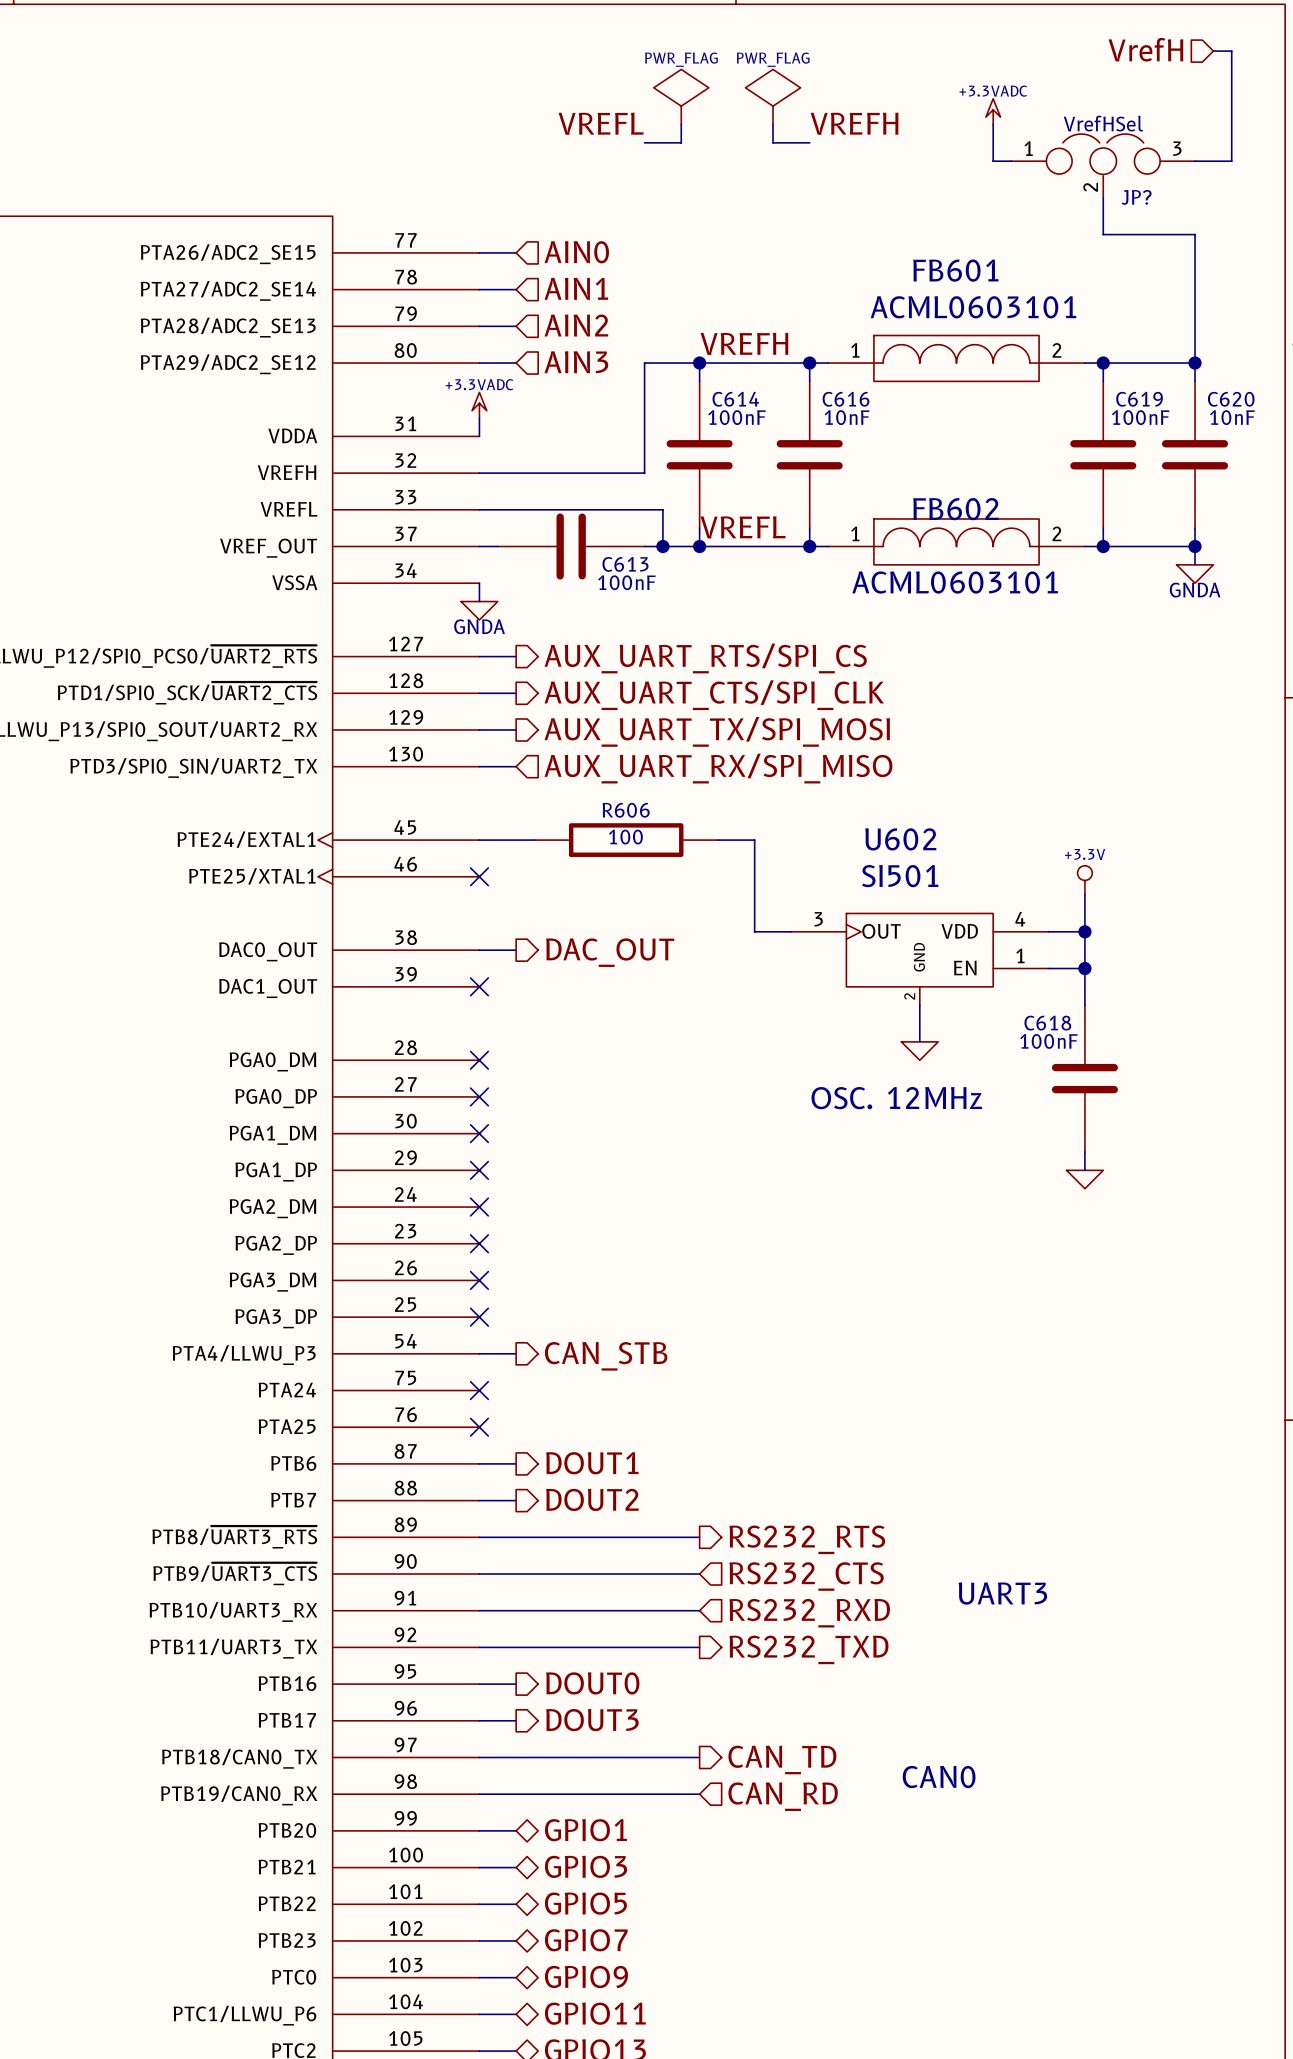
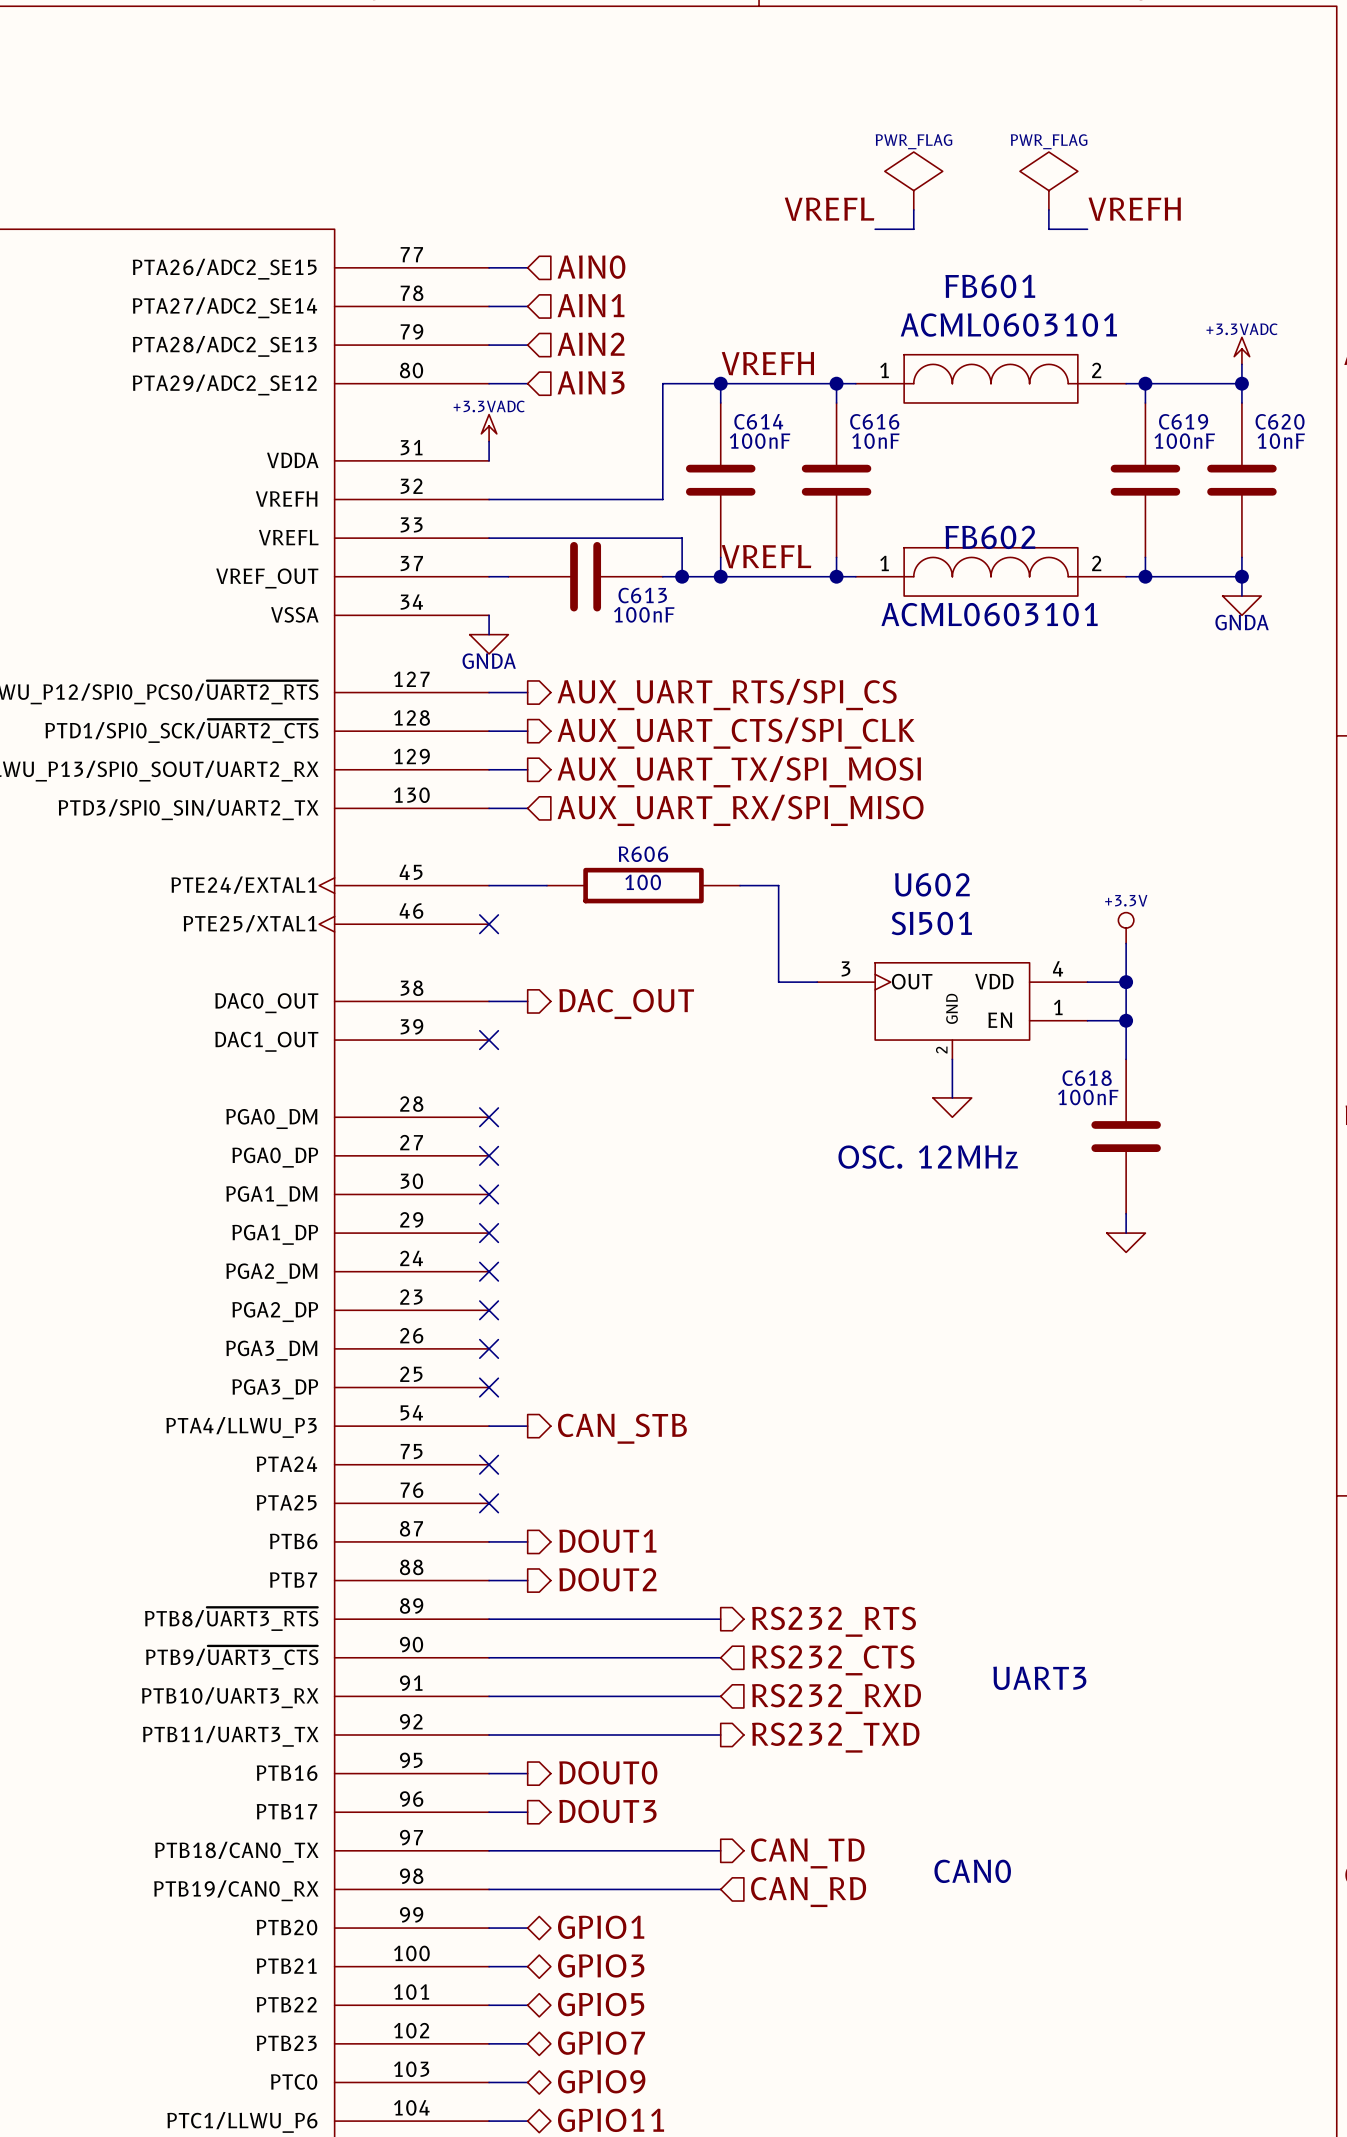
hierarchical label: VrefH (1145, 49) -> none
wire: (1213, 51) (1231, 51) (1231, 161) (1195, 161) -> none
power symbol: PWR_FLAG (681, 96) -> none
power symbol: PWR_FLAG (773, 96) -> none
power symbol position: +3.3VADC (993, 111) -> +3.3VADC (1241, 350)
label position: VREFL (601, 123) -> VREFL (829, 209)
label position: VREFH (854, 123) -> VREFH (1134, 209)
wire: (681, 124) (681, 142) (644, 142) -> (913, 209) (913, 229) (875, 229)
wire: (773, 124) (773, 142) (809, 142) -> (1048, 209) (1048, 229) (1087, 229)
wire: (993, 124) (993, 161) (1011, 161) -> none
JP?: VrefHSel (1103, 165) -> none
power symbol: none -> PWR_FLAG (913, 180)
power symbol: none -> PWR_FLAG (1048, 180)
wire: (1103, 197) (1103, 234) (1195, 234) (1195, 344) -> none

